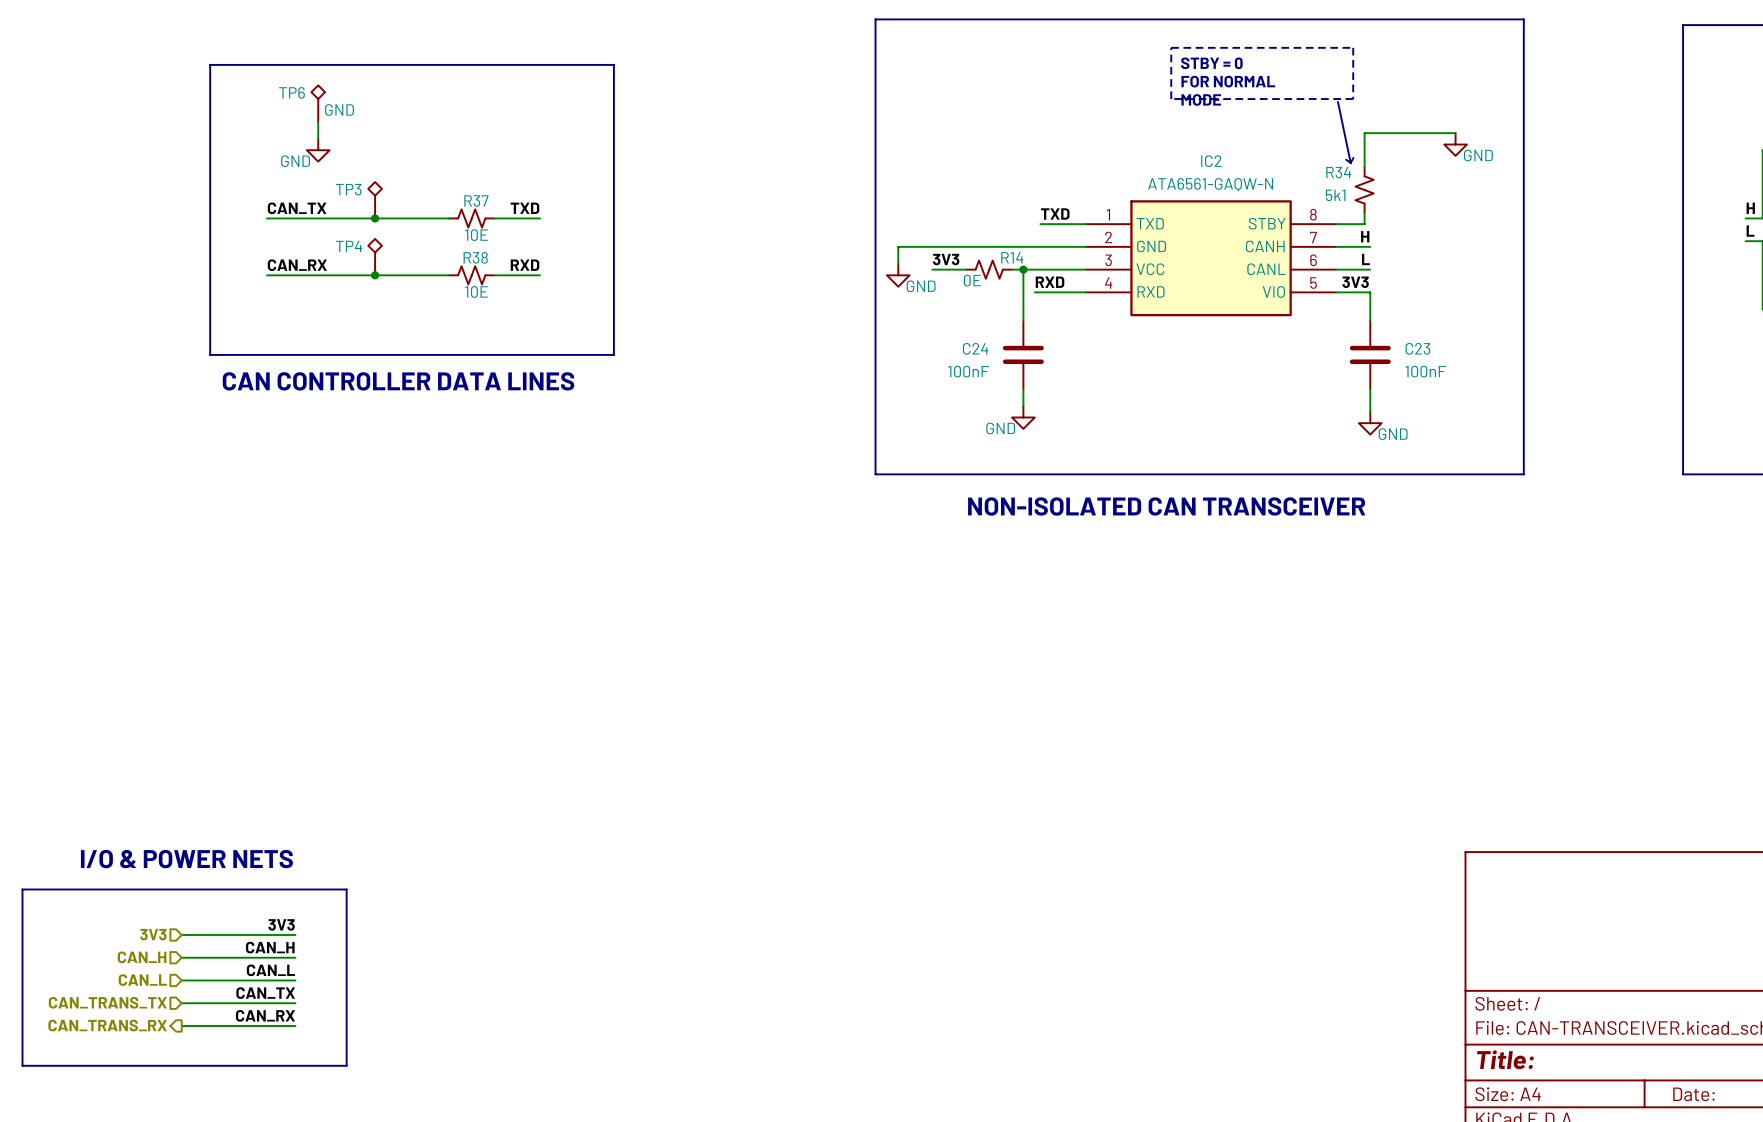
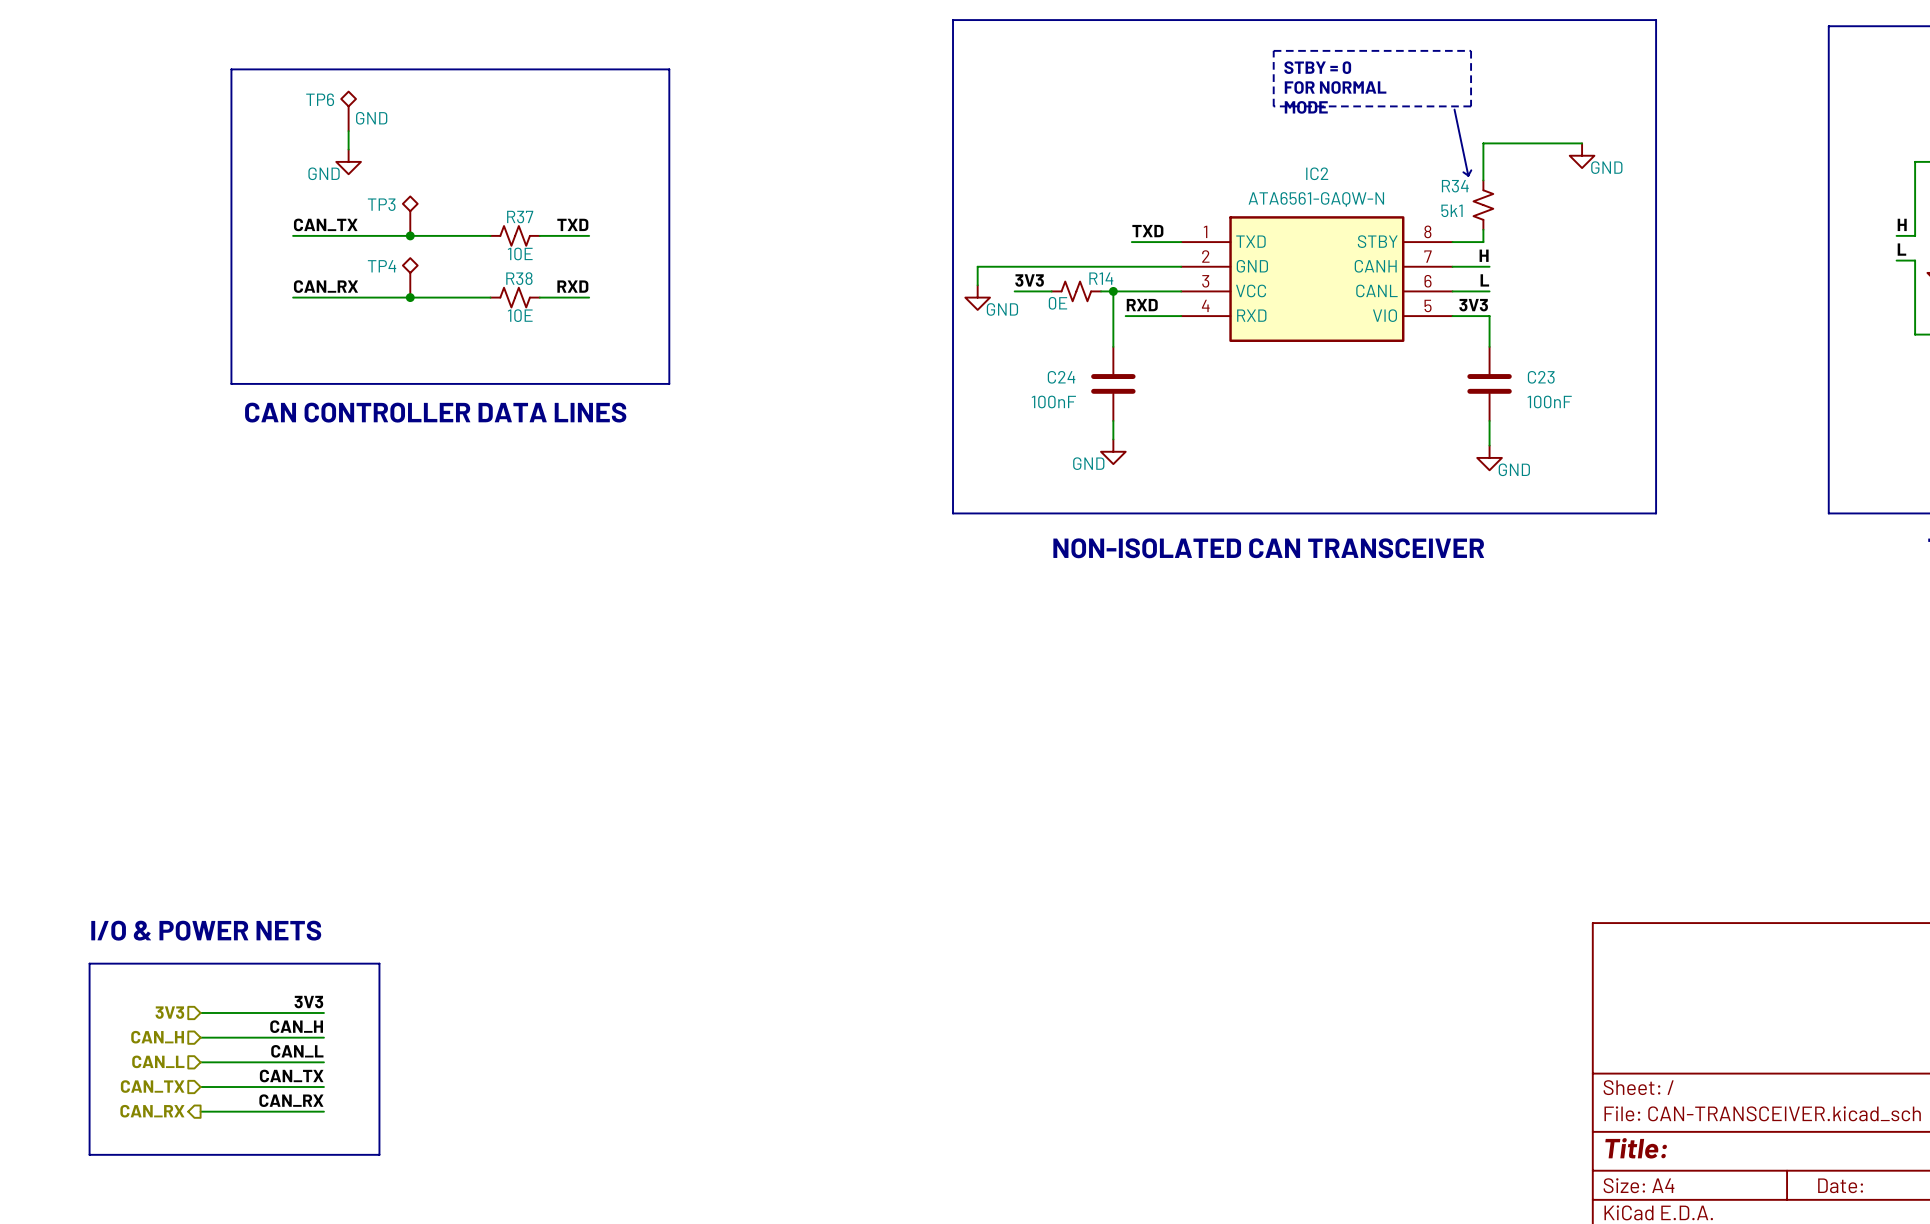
bus: (79, 889) (22, 889) (22, 1065) (79, 1065) -> (89, 963) (89, 1154)
hierarchical label: CAN_TRANS_TX (107, 1002) -> CAN_TX (152, 1086)
hierarchical label: CAN_TRANS_RX (107, 1025) -> CAN_RX (152, 1111)

